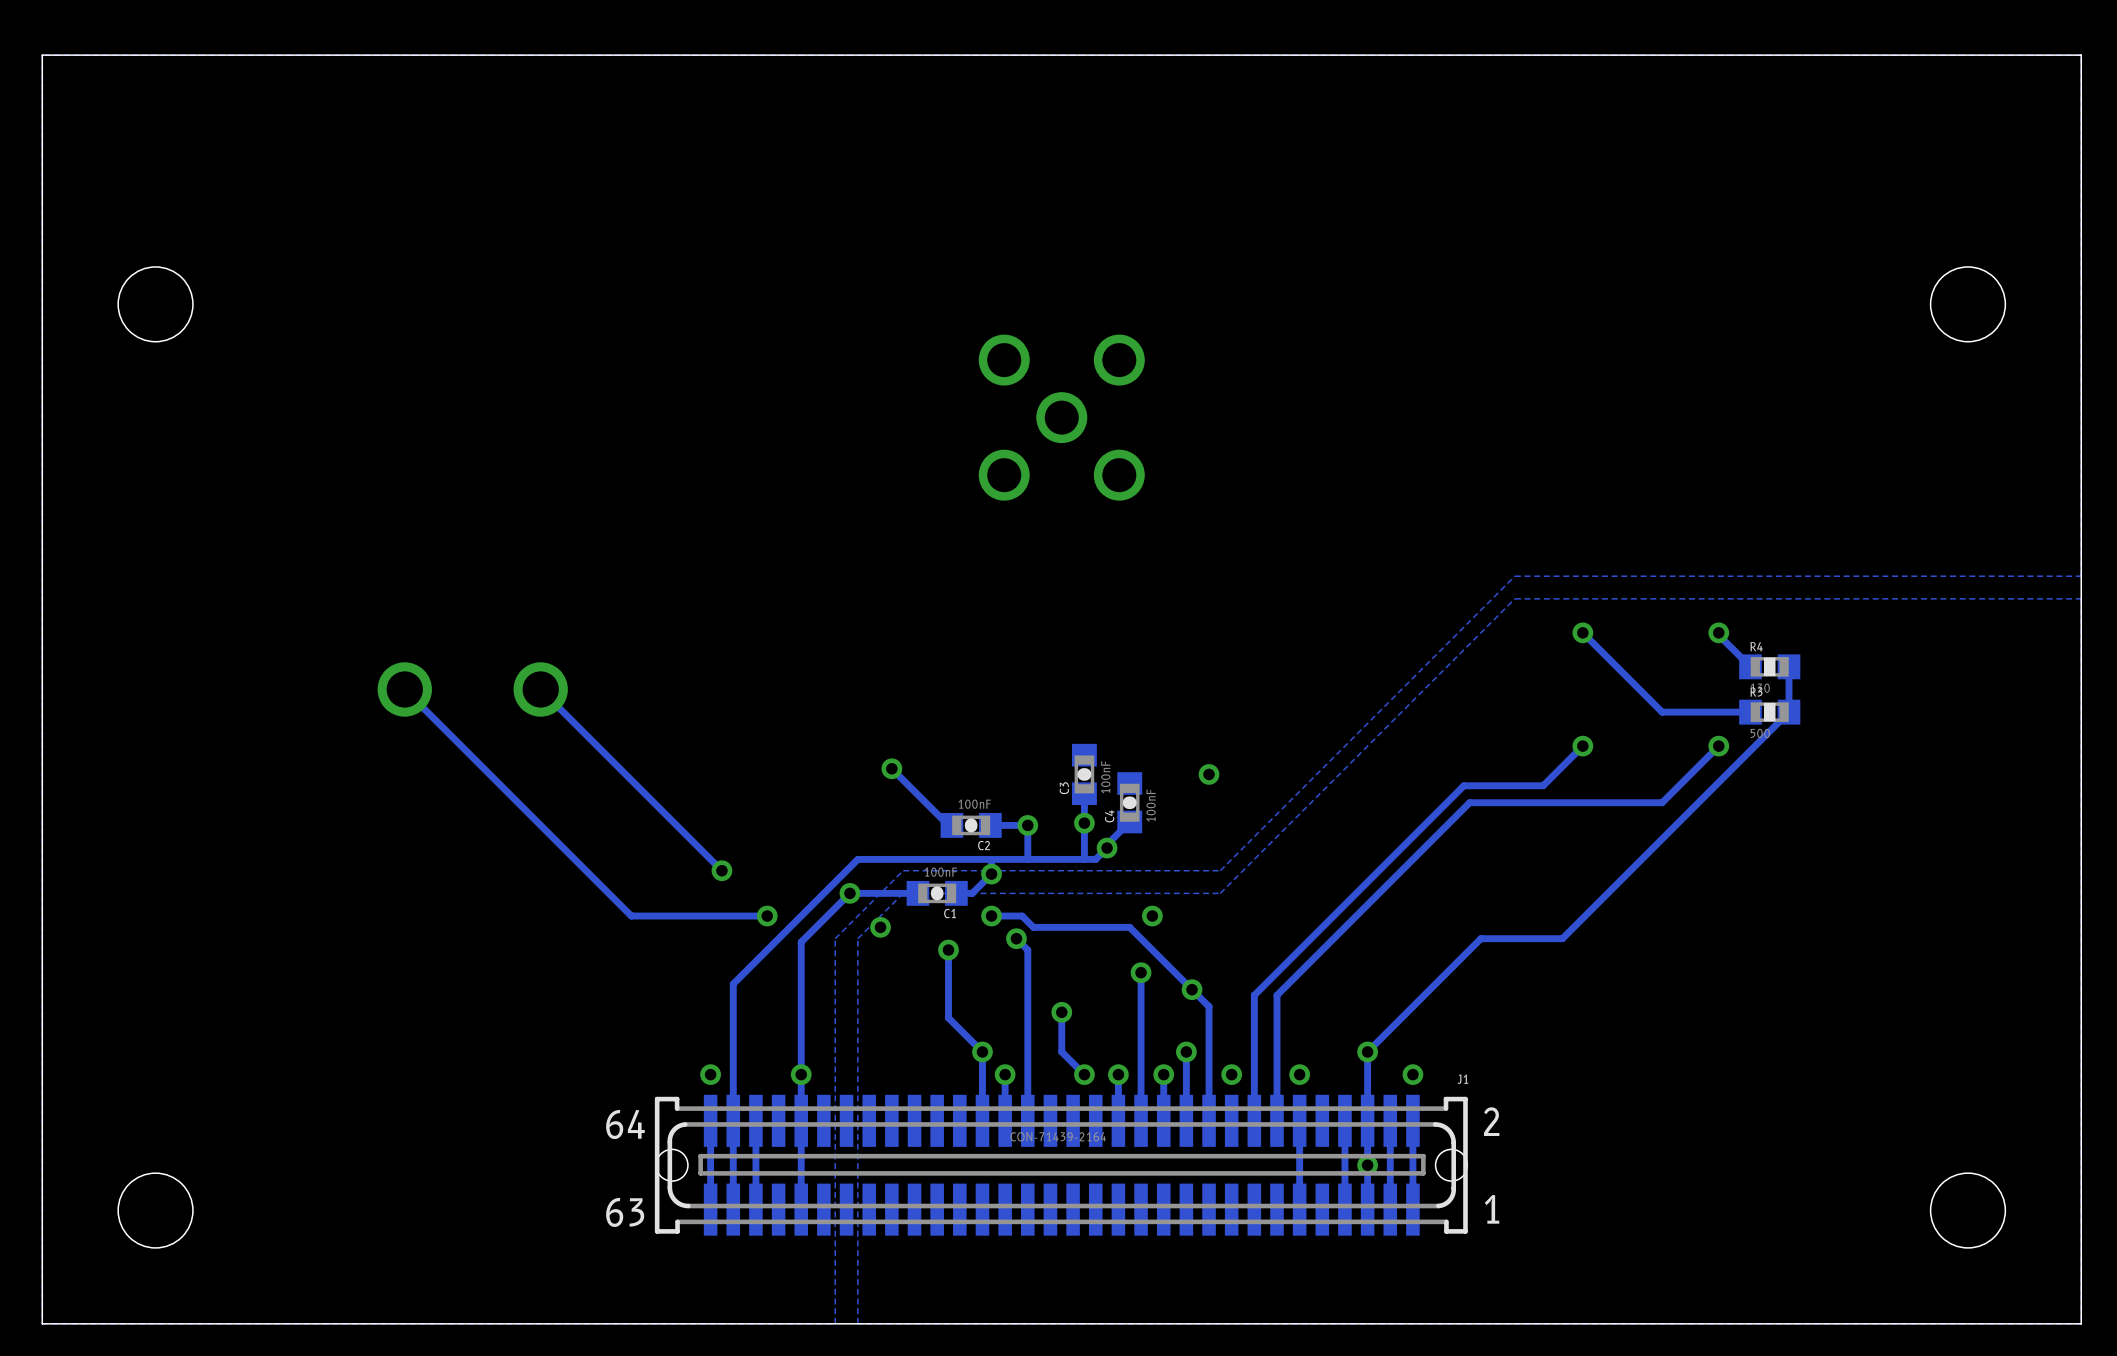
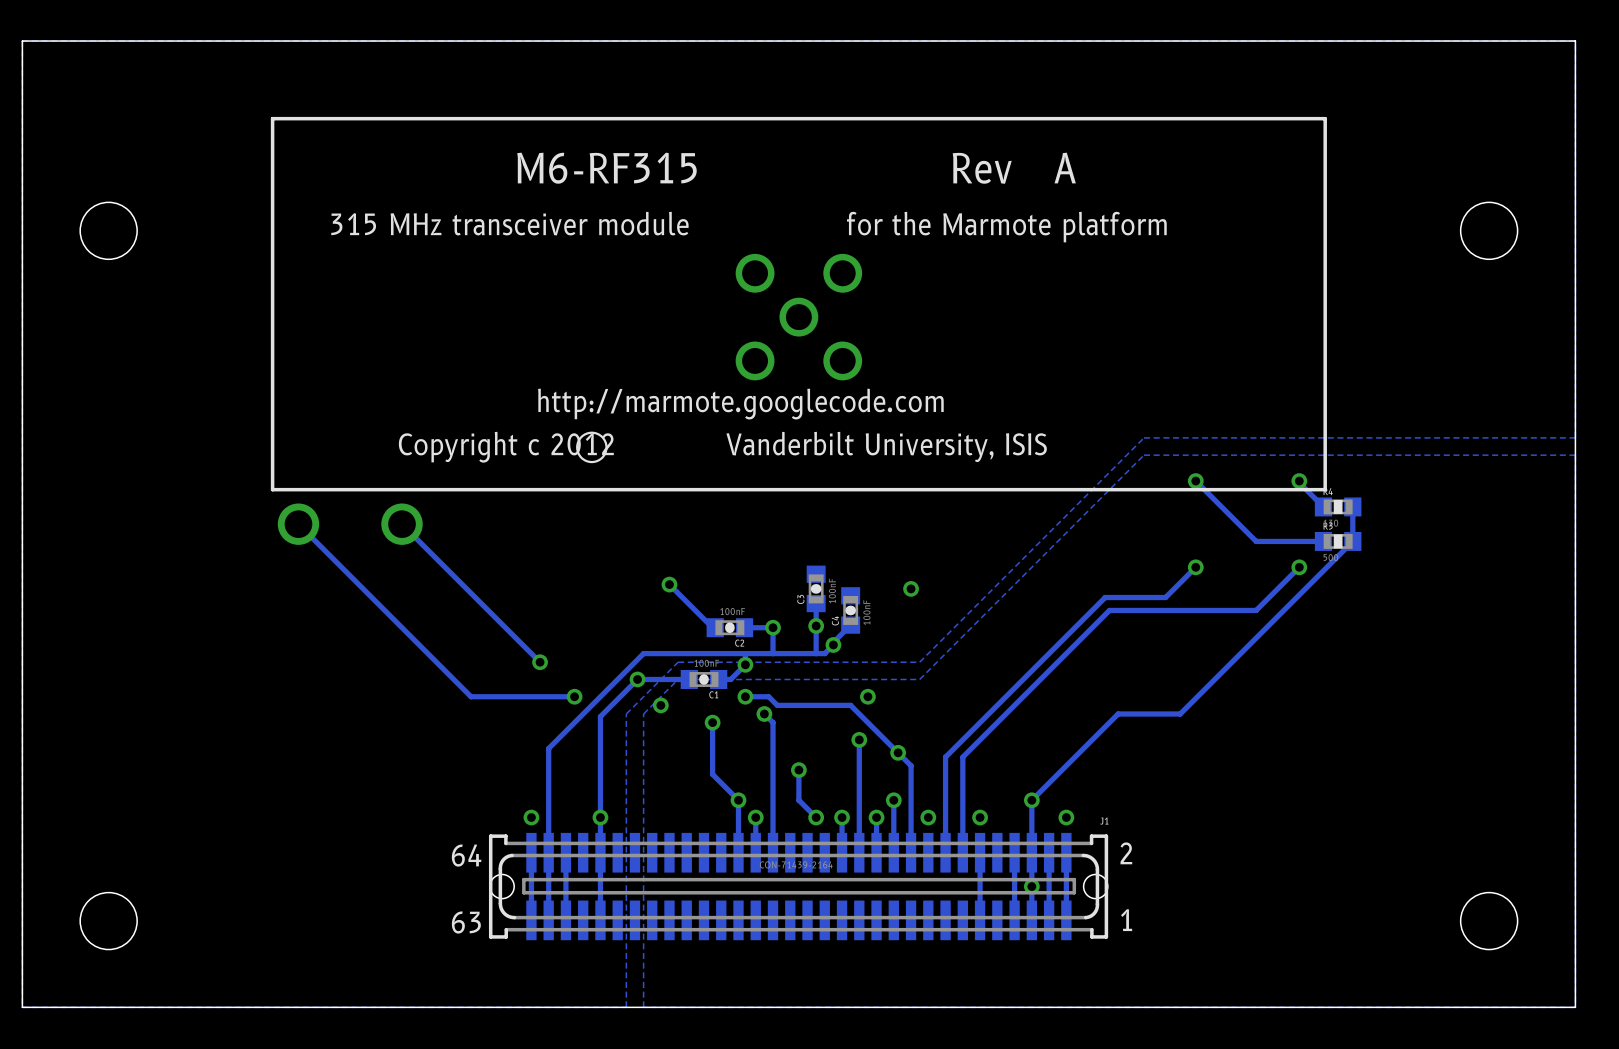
line: none -> (1325, 118) (1325, 489) (272, 489) (272, 118) (1325, 118)
text: none -> A (1065, 168)
text: none -> M6-RF315 (607, 168)
text: none -> Rev (982, 168)
text: none -> 315 MHz transceiver module (509, 223)
text: none -> for the Marmote platform (1006, 227)
text: none -> http://marmote.googlecode.com (740, 404)
drawing: none -> [576, 431, 608, 464]
text: none -> Copyright c 2012 (506, 447)
text: none -> Vanderbilt University, ISIS (886, 446)

